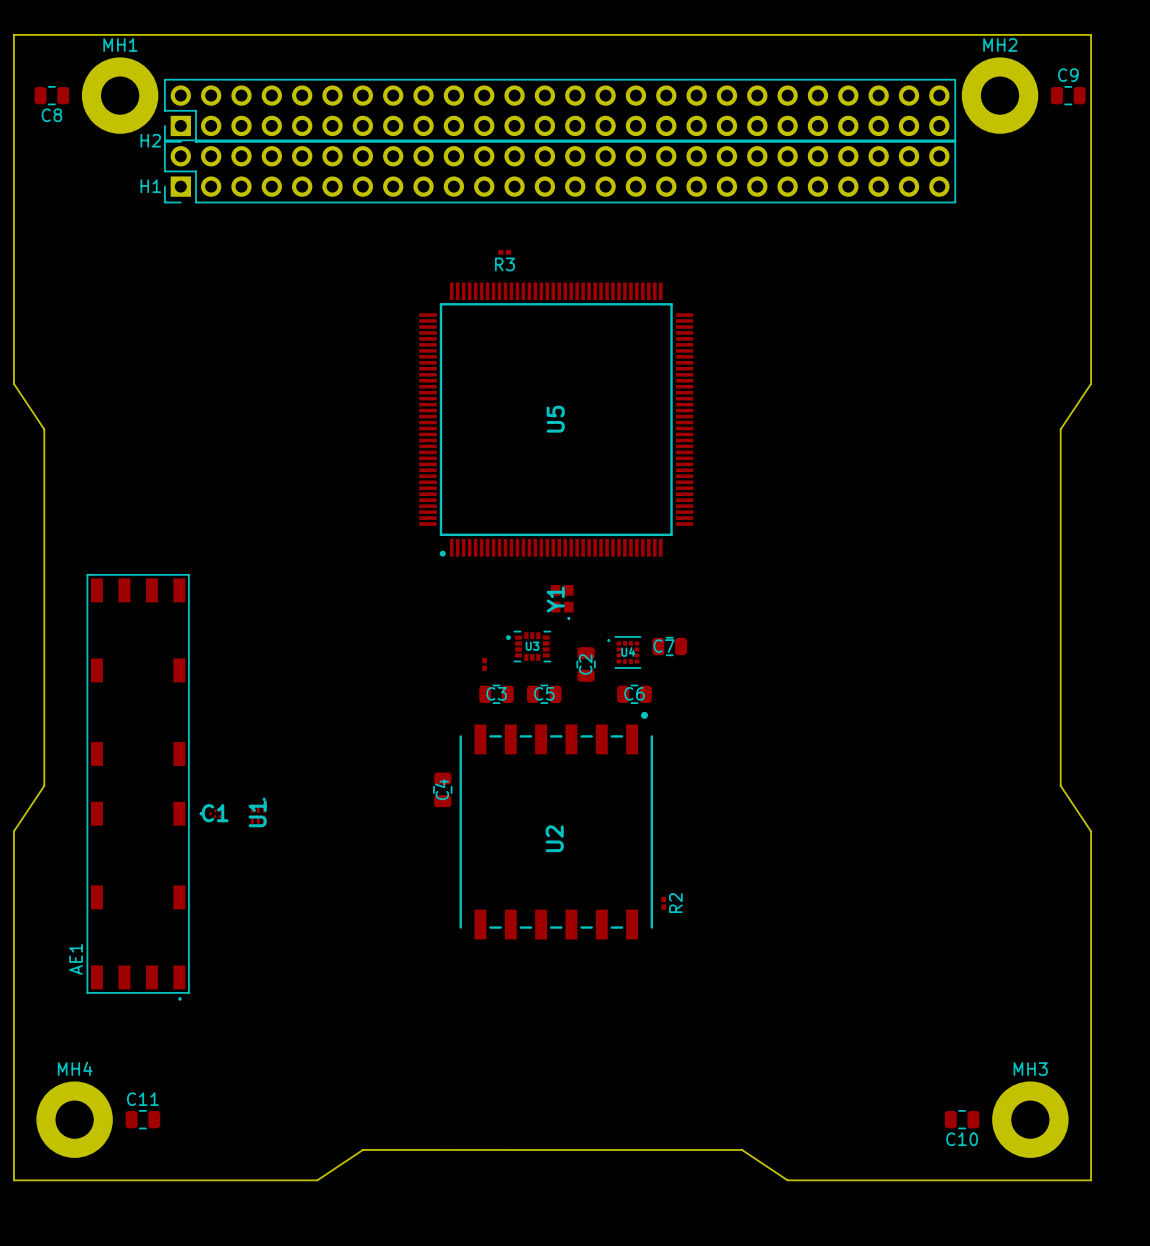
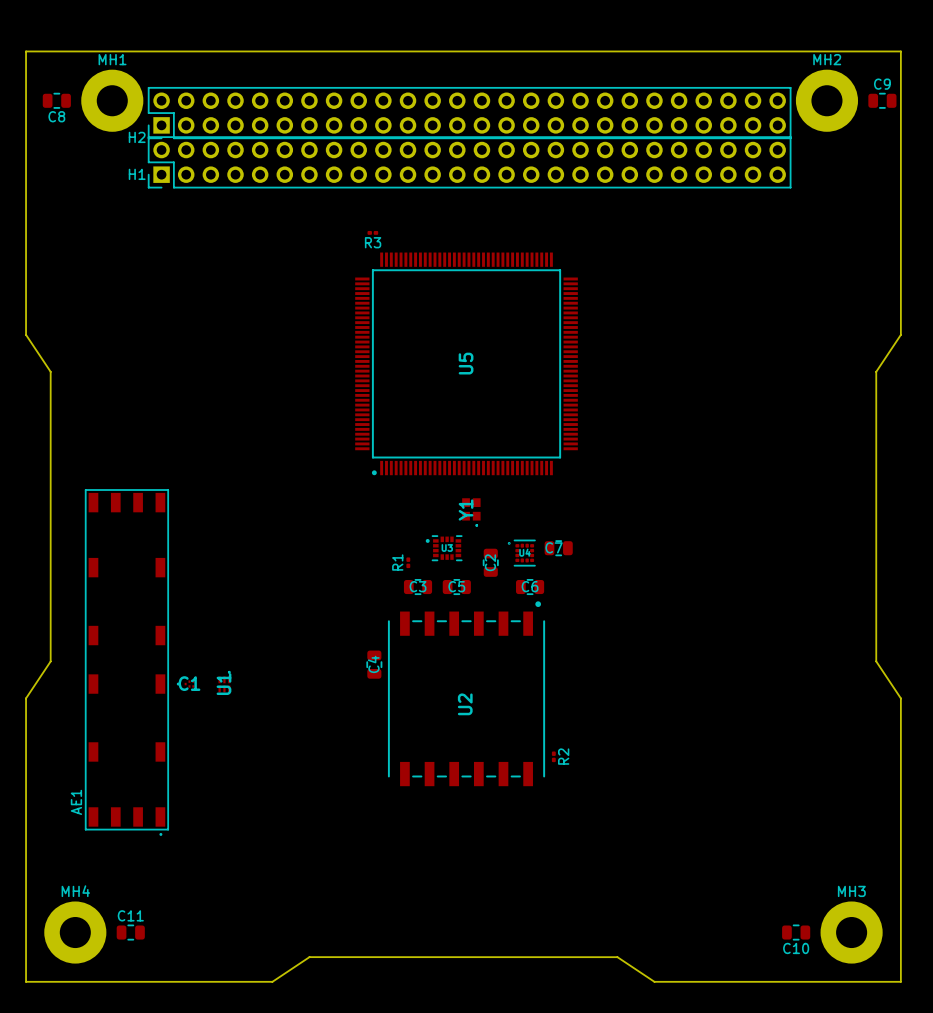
R3 position: (504, 252) -> (372, 232)
R1 name: none -> R1 (397, 562)

